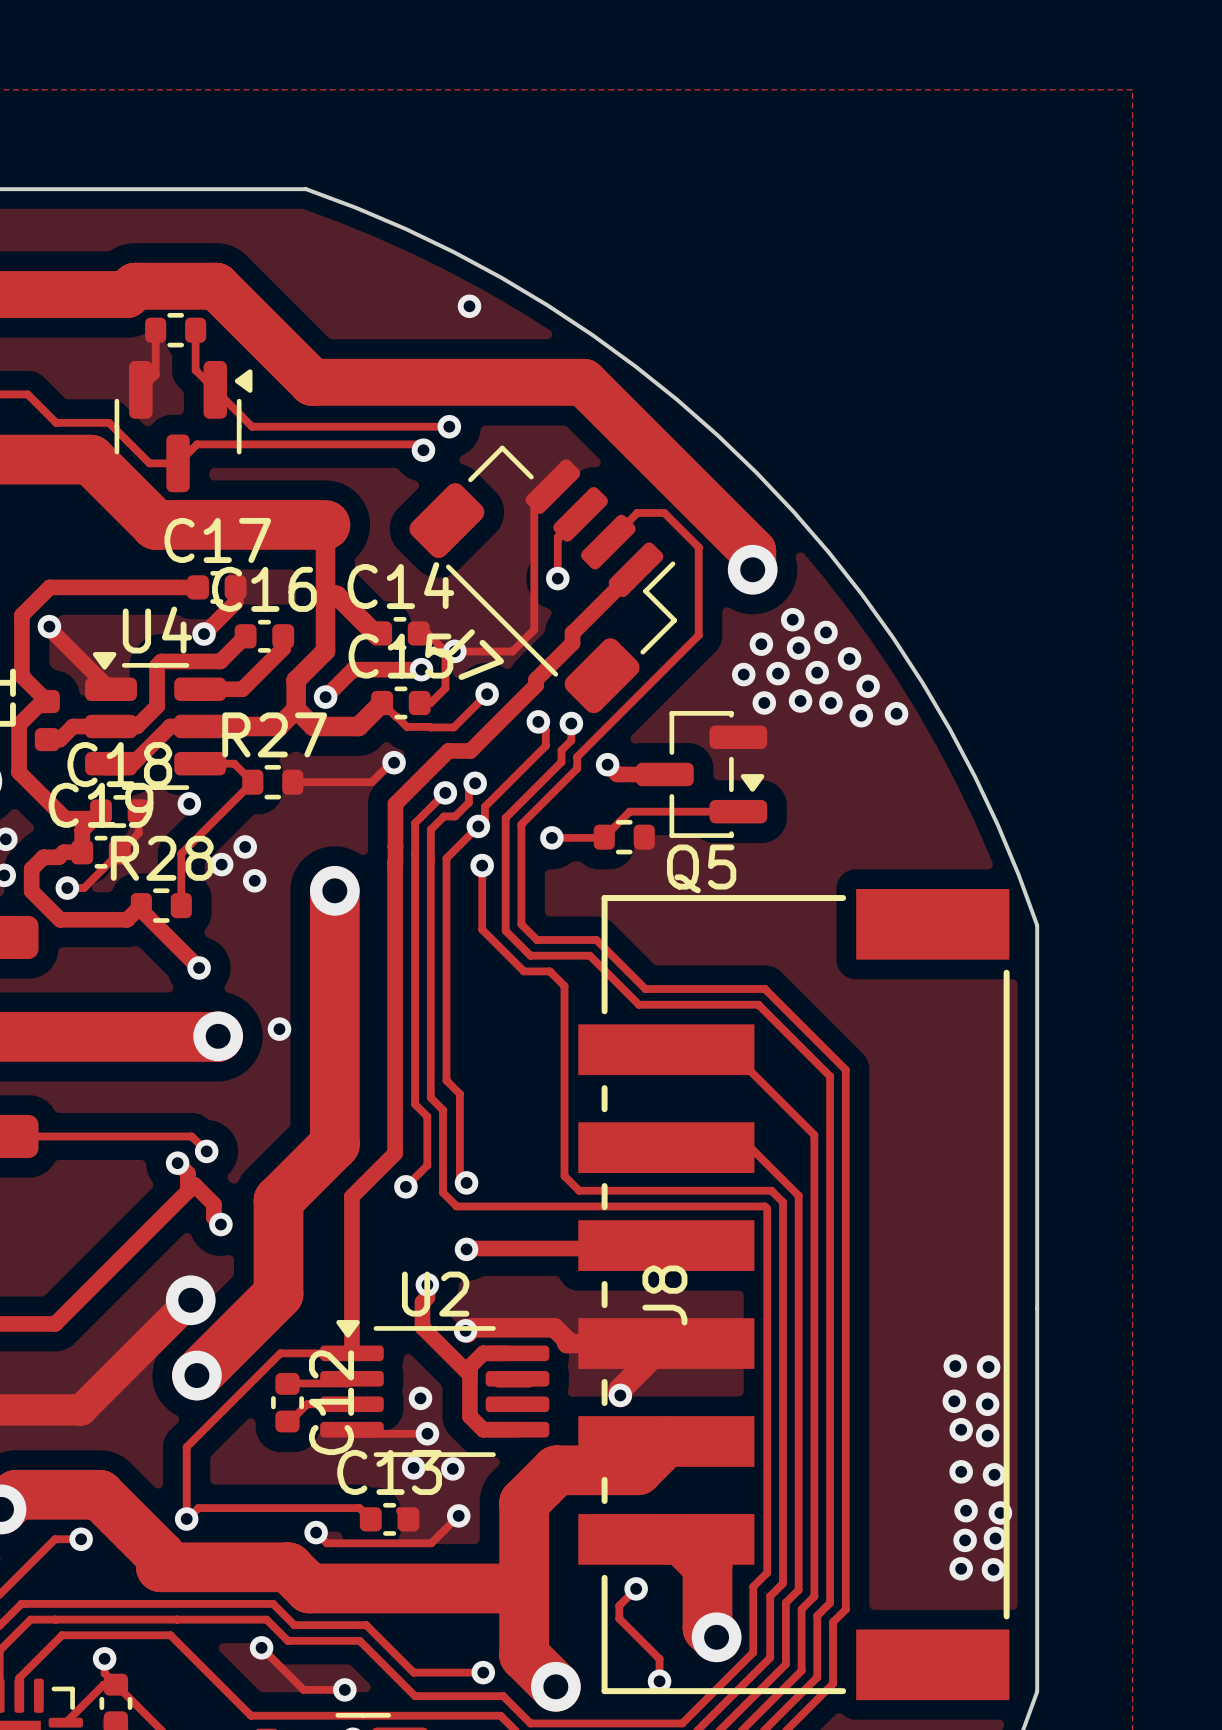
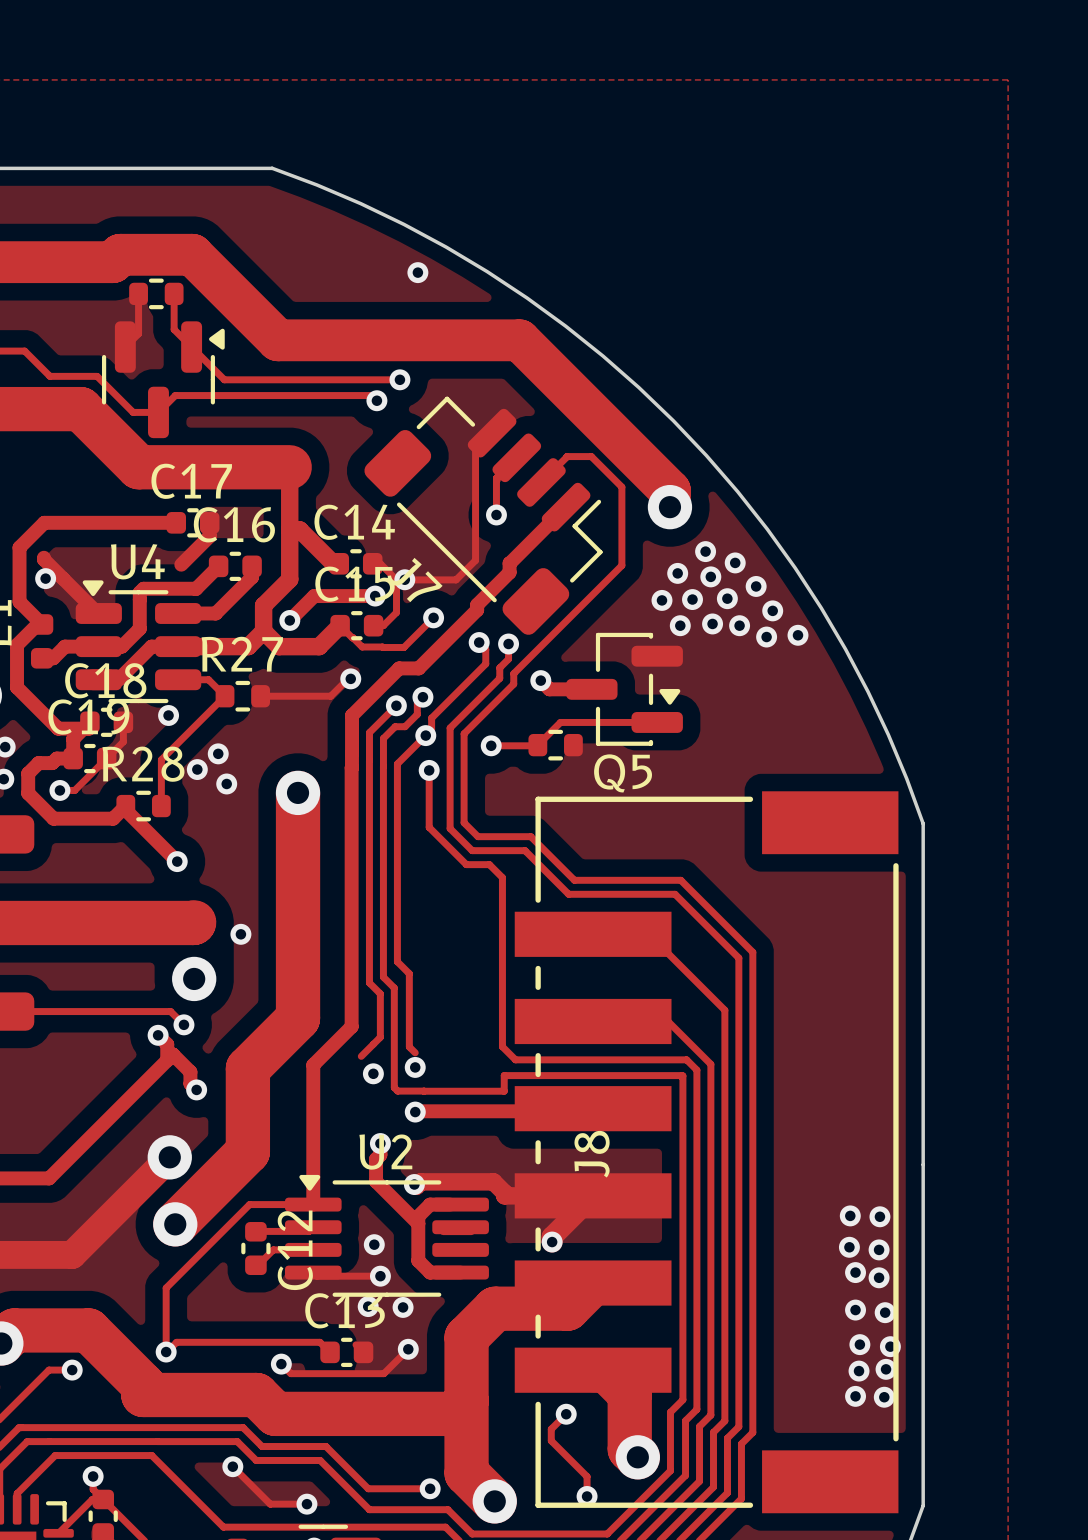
via position: (49, 626) -> (45, 578)
via: (204, 634) -> none
via position: (279, 1029) -> (240, 934)
via position: (218, 1036) -> (194, 978)
via position: (466, 1182) -> (415, 1067)
via position: (405, 1186) -> (373, 1073)
track: (443, 1192) (456, 1206) (764, 1206) (767, 1208) -> (394, 1061) (394, 1087) (397, 1091) (504, 1091) (504, 1075) (682, 1075)

